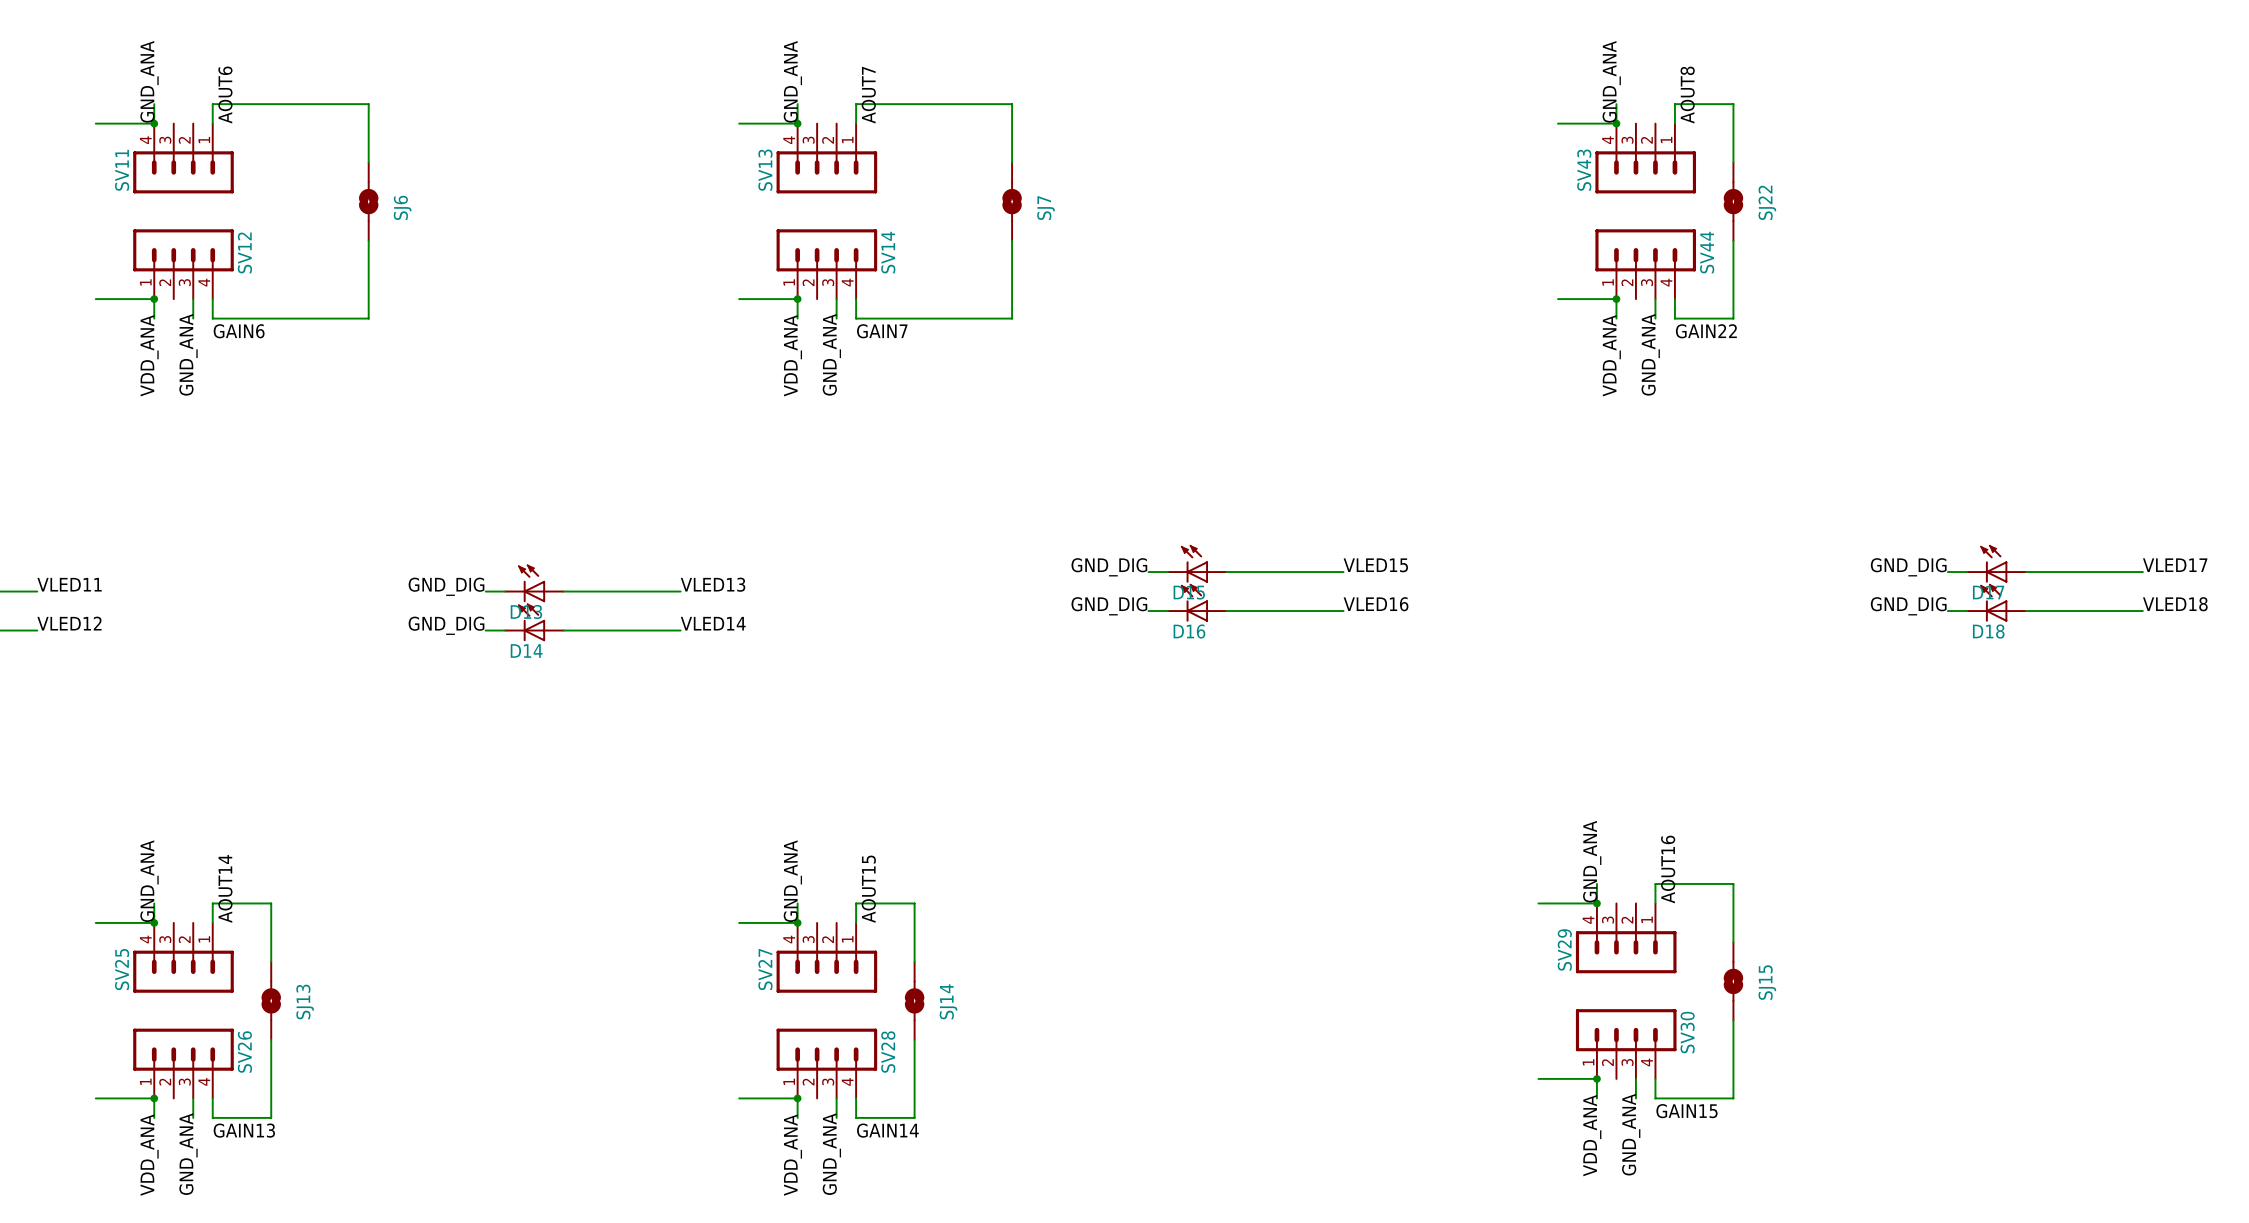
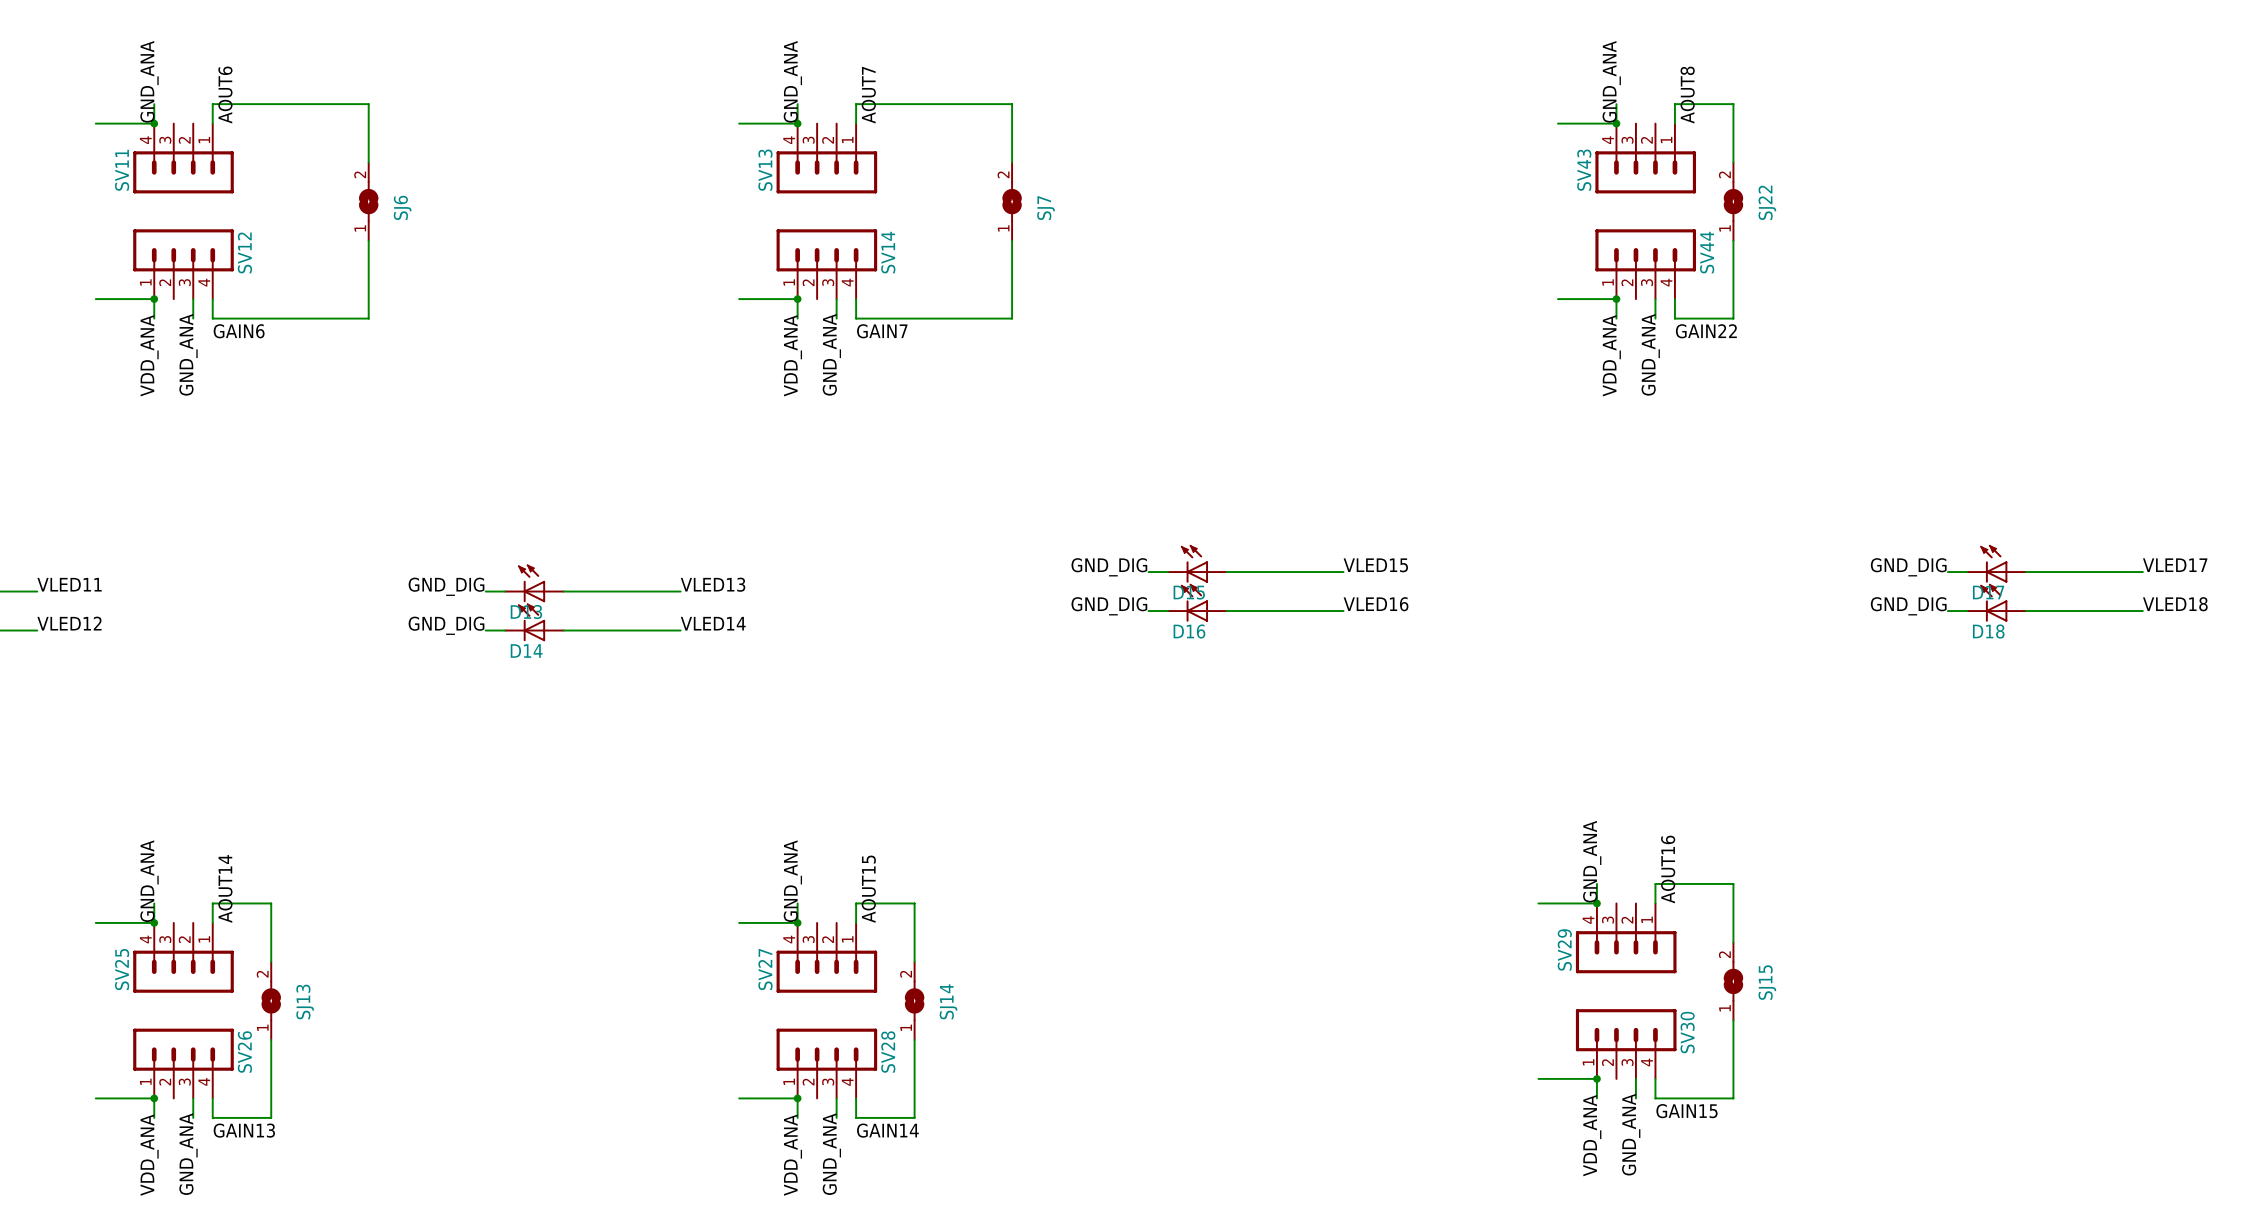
SJ6 pin number: none -> 2 (360, 174)
SJ7 pin number: none -> 2 (1003, 174)
SJ22 pin number: none -> 2 (1724, 174)
SJ6 pin number: none -> 1 (360, 228)
SJ7 pin number: none -> 1 (1003, 228)
SJ22 pin number: none -> 1 (1724, 228)
SJ15 pin number: none -> 2 (1724, 954)
SJ13 pin number: none -> 2 (262, 974)
SJ14 pin number: none -> 2 (906, 974)
SJ15 pin number: none -> 1 (1724, 1008)
SJ13 pin number: none -> 1 (262, 1027)
SJ14 pin number: none -> 1 (906, 1027)

